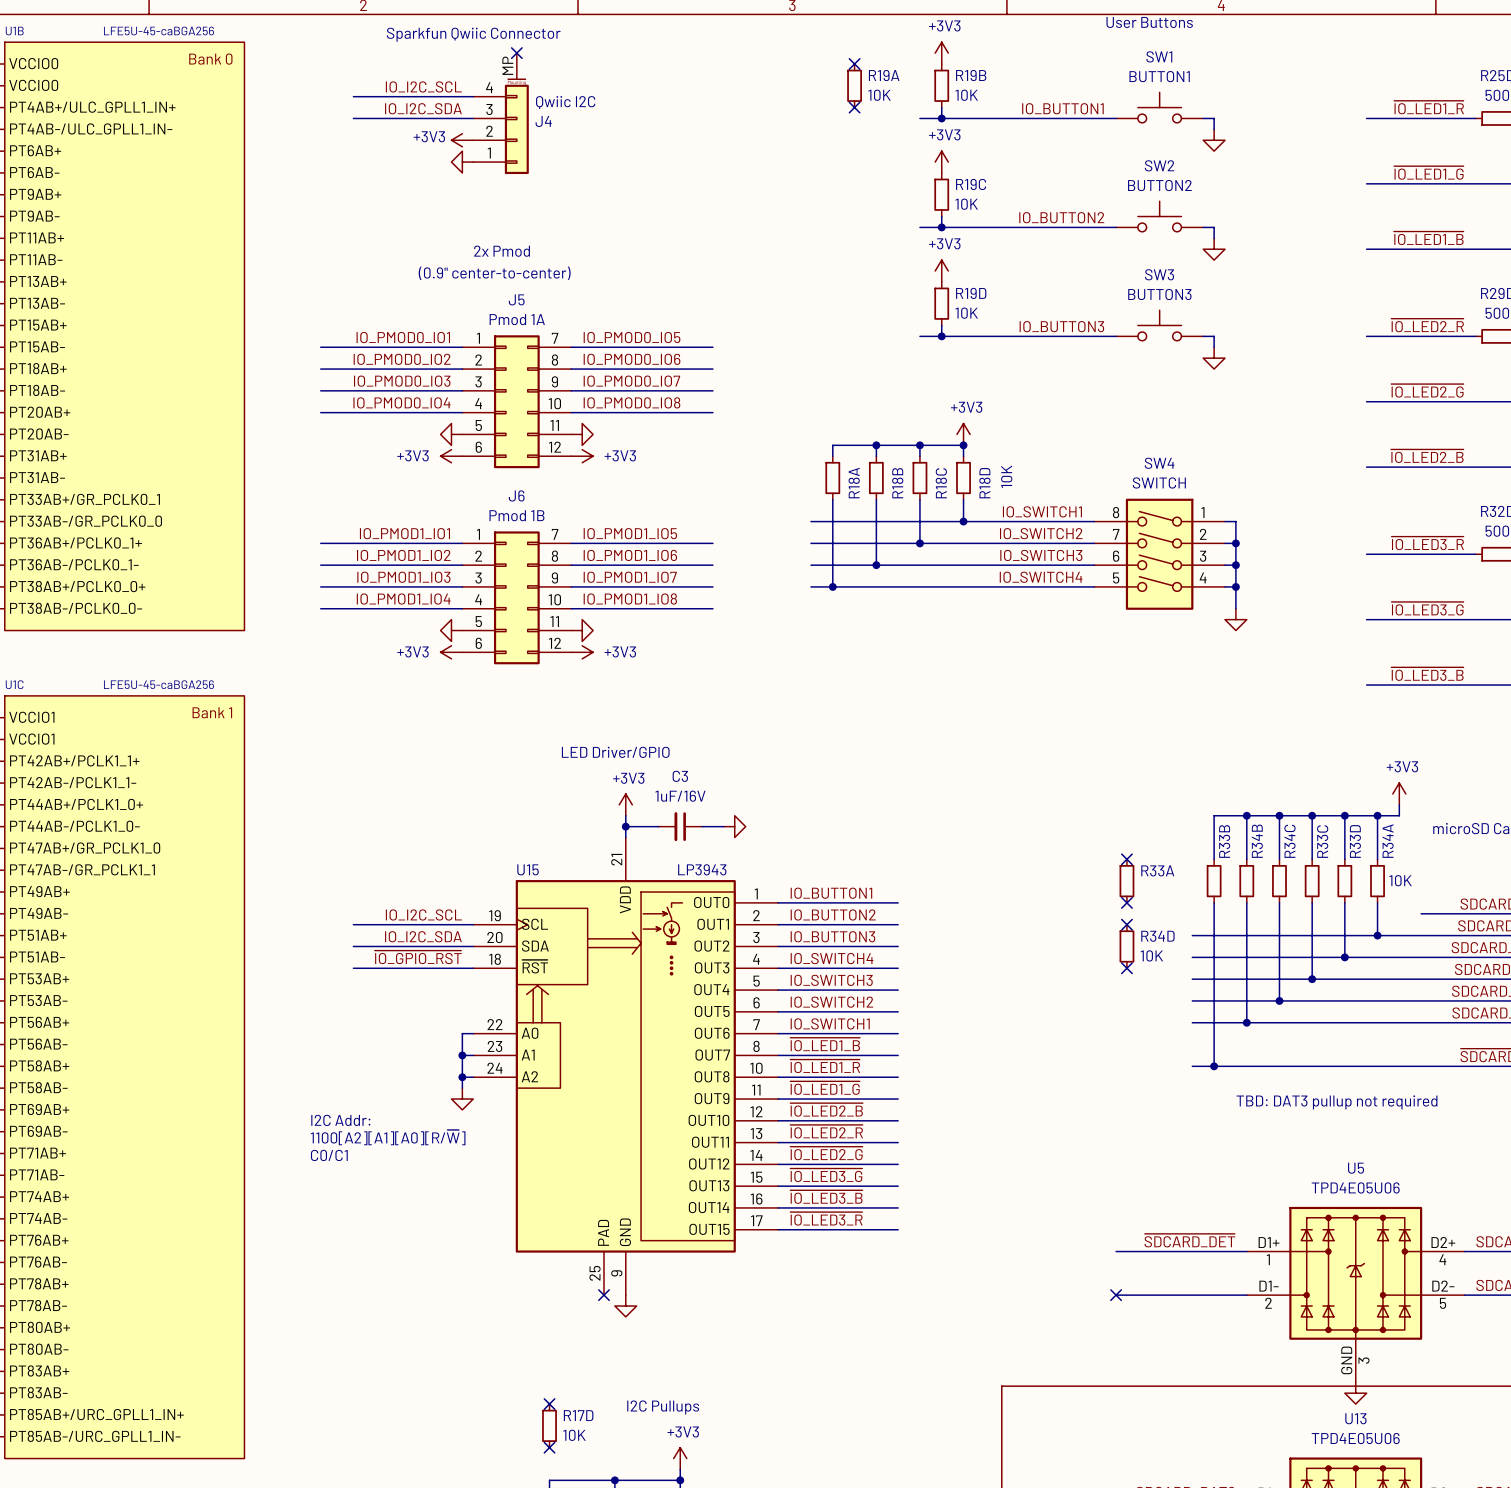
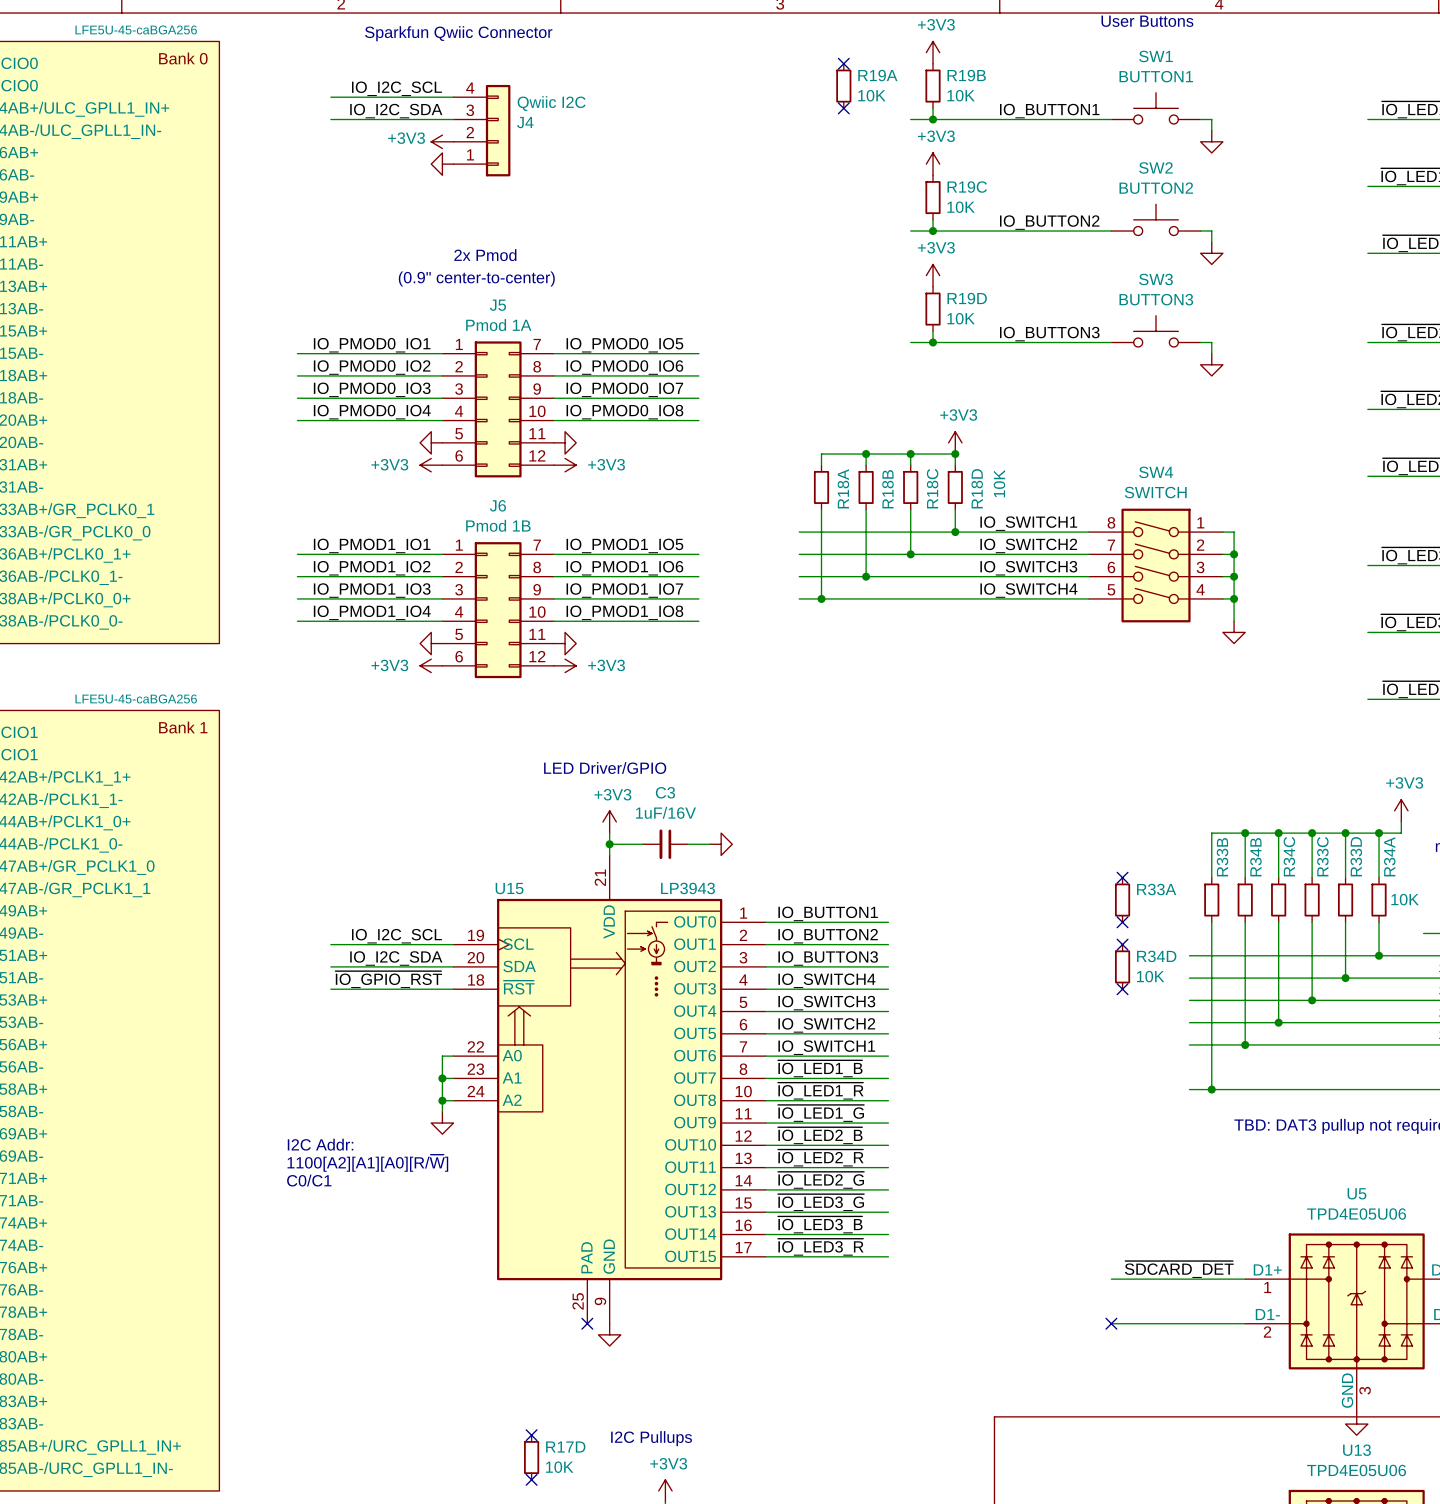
J4 symbol: [473, 53, 529, 175] -> [453, 84, 511, 177]
no-connect mark: (516, 53) -> none

